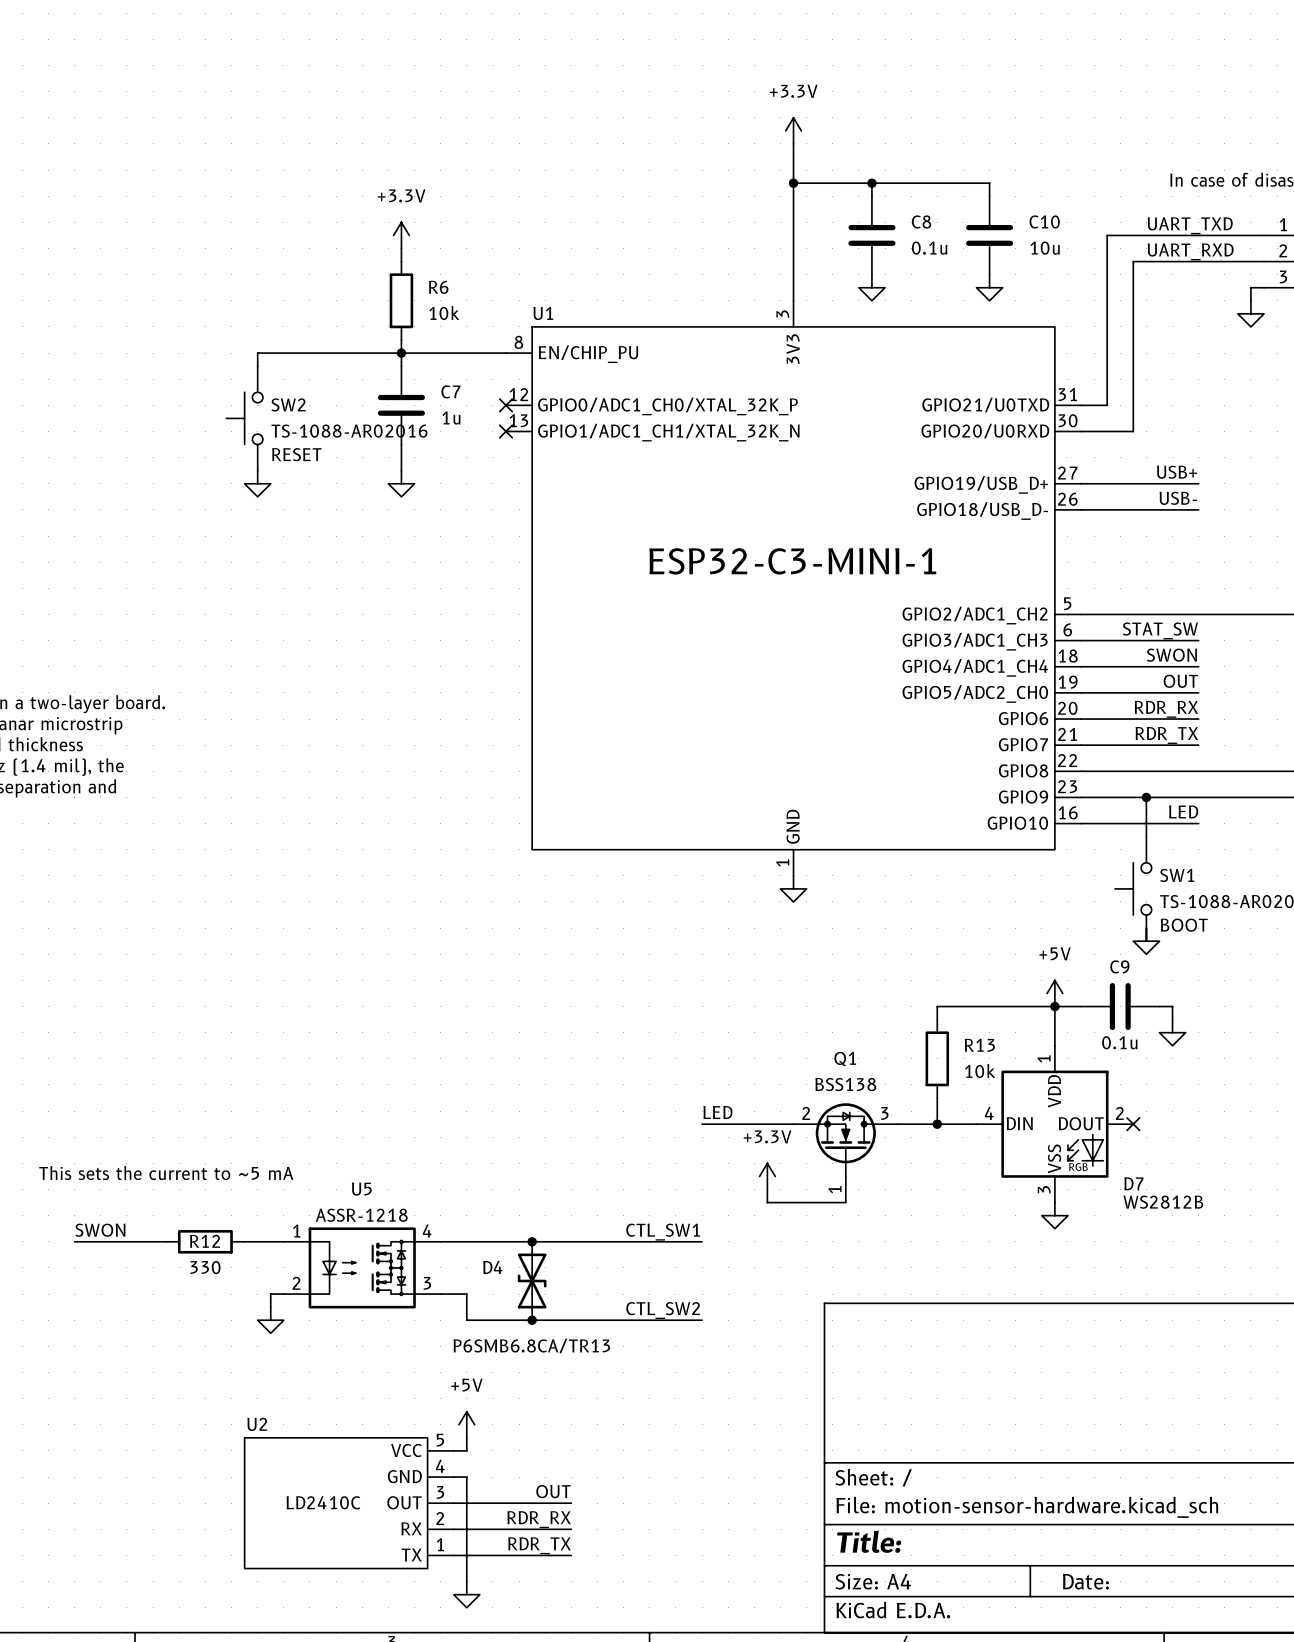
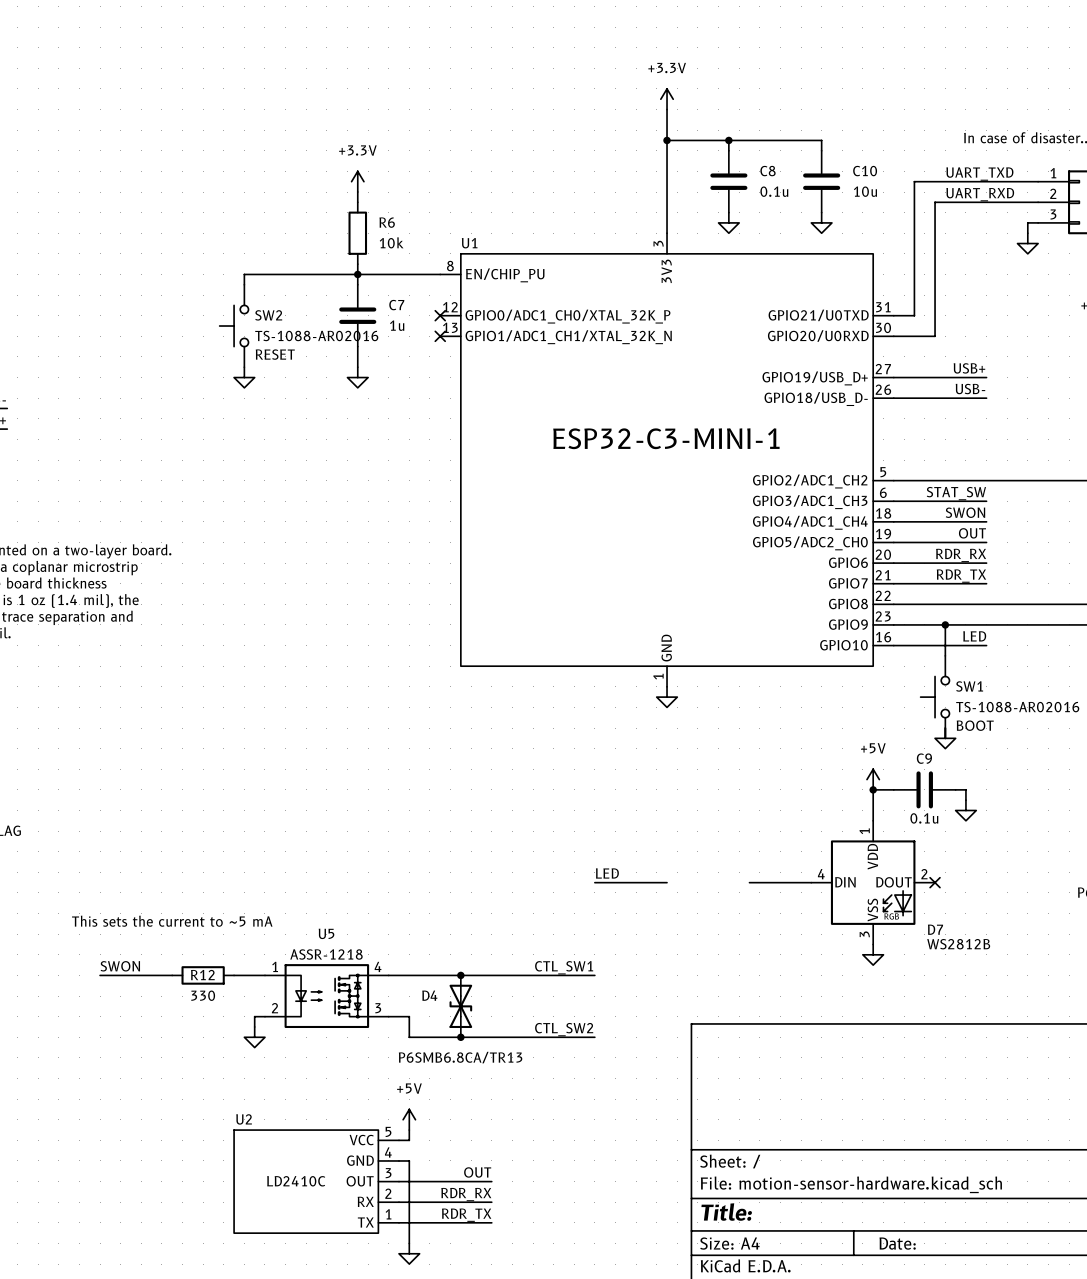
wire: (1054, 1006) (937, 1006) (937, 1019) -> none
R13: 10k (937, 1058) -> none
wire: (937, 1098) (937, 1124) -> none
junction: (937, 1124) -> none
Q1: BSS138 (845, 1152) -> none
power symbol: +3.3V (767, 1176) -> none
wire: (767, 1189) (767, 1202) (845, 1202) -> none

